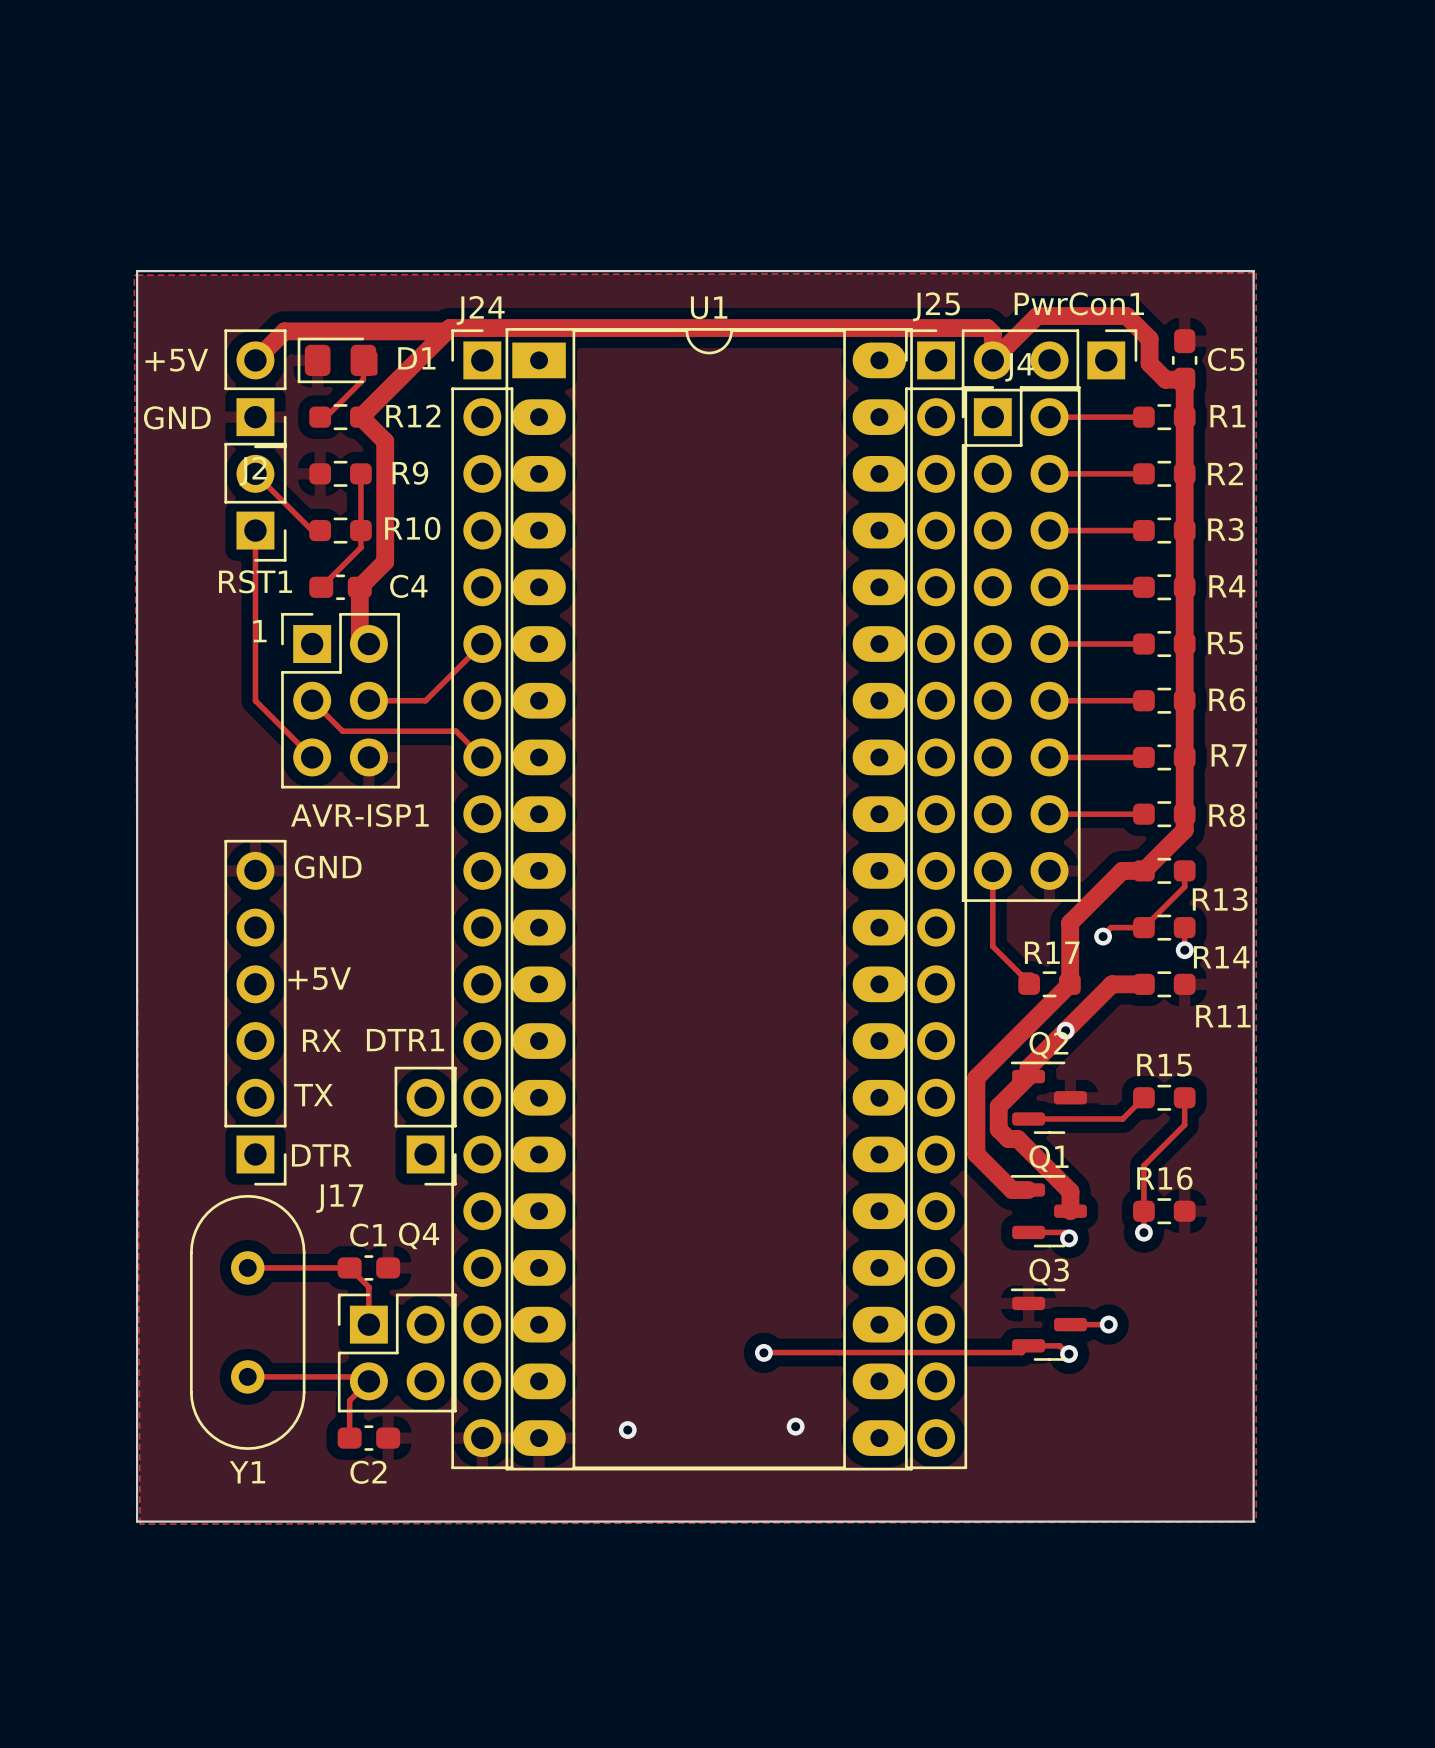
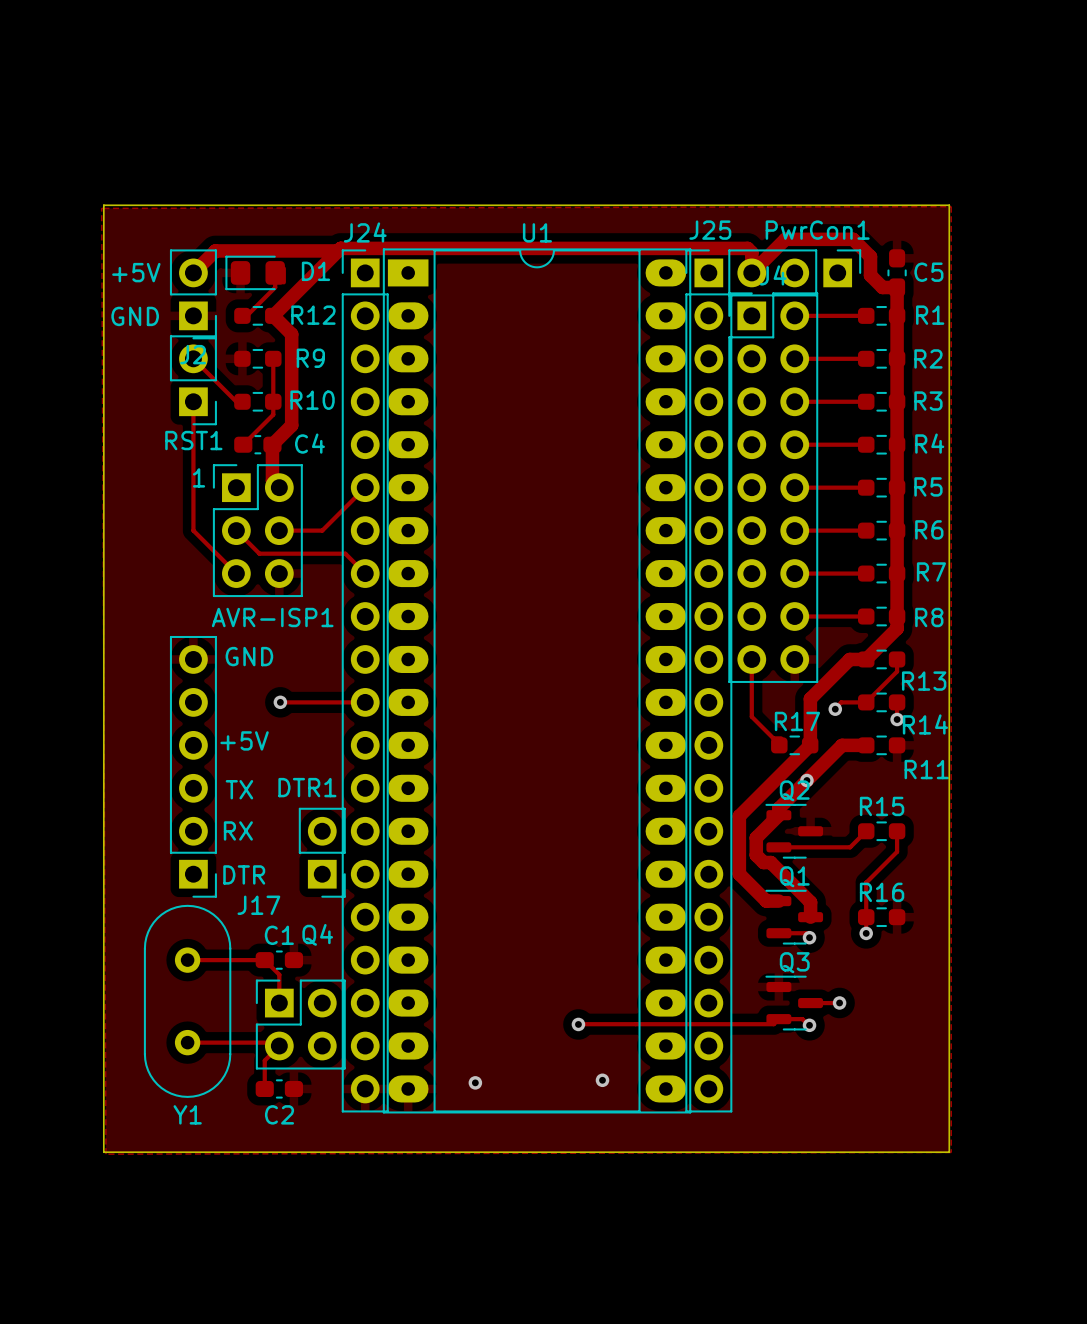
track: none -> (280, 702) (365, 702)
via: none -> (280, 702)
text: RX (322, 1040) -> TX (239, 789)
text: TX (313, 1095) -> RX (238, 830)

